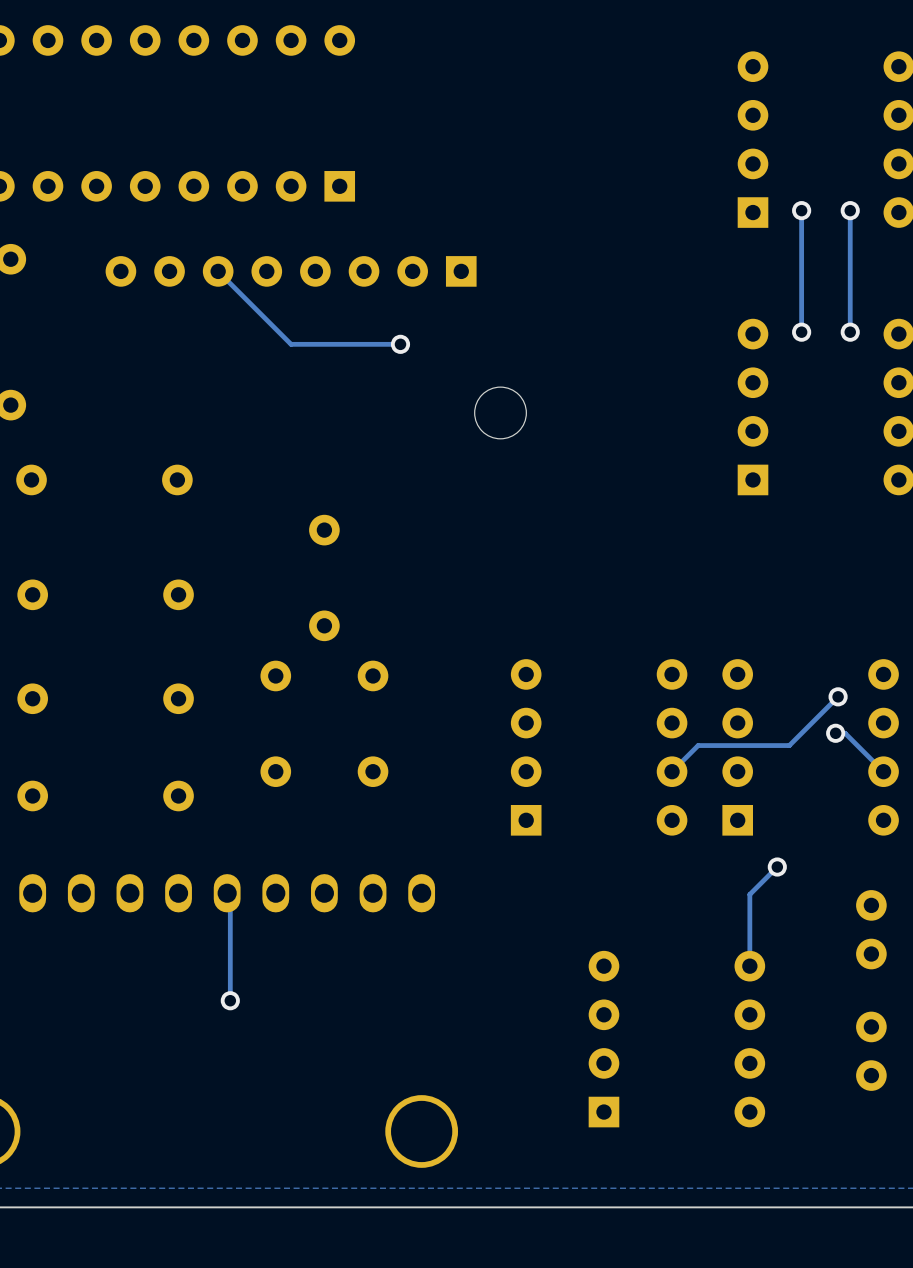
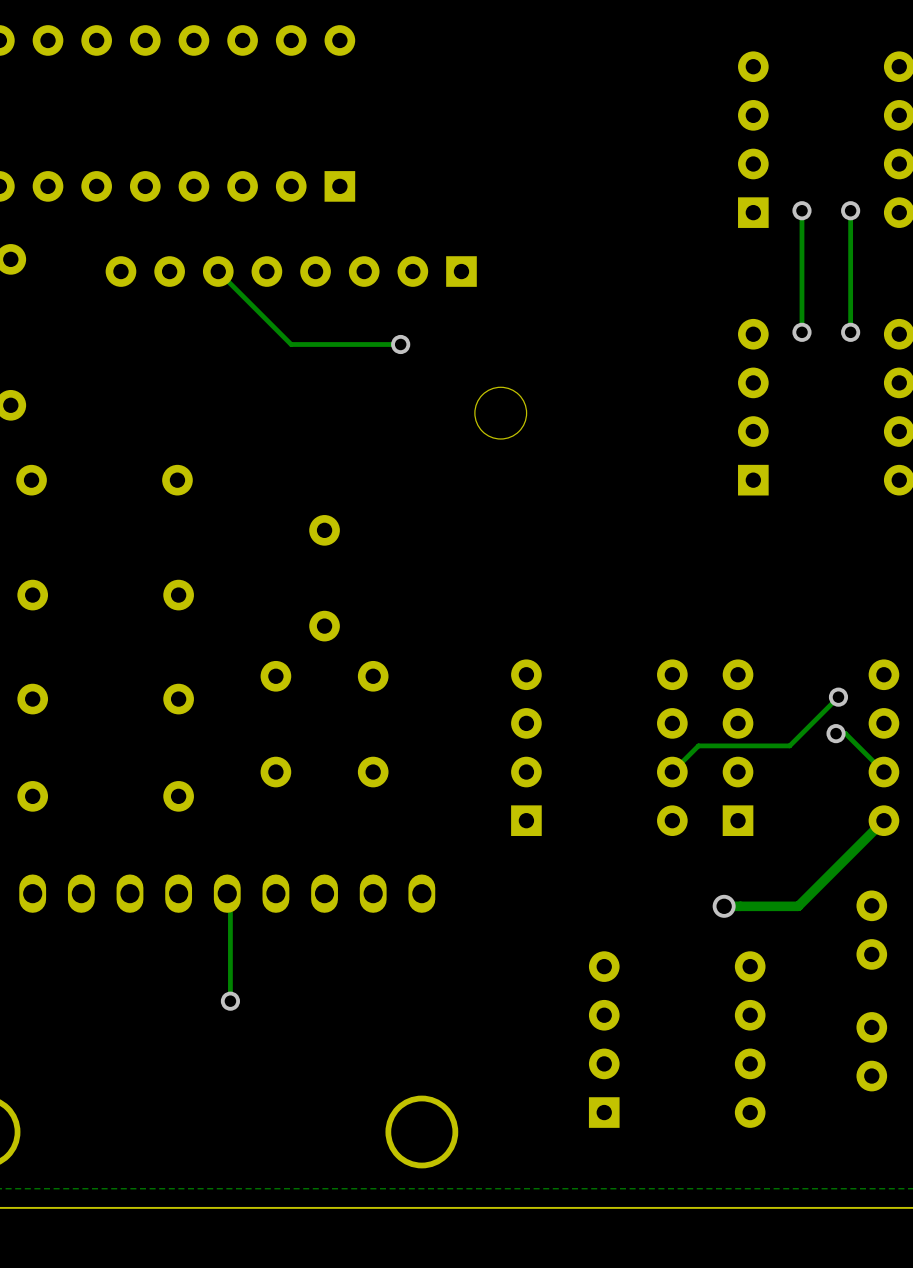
track: none -> (883, 820) (798, 906) (724, 906)
track: (777, 867) (749, 894) (749, 966) -> none
via: (777, 867) -> none
via: none -> (724, 906)

